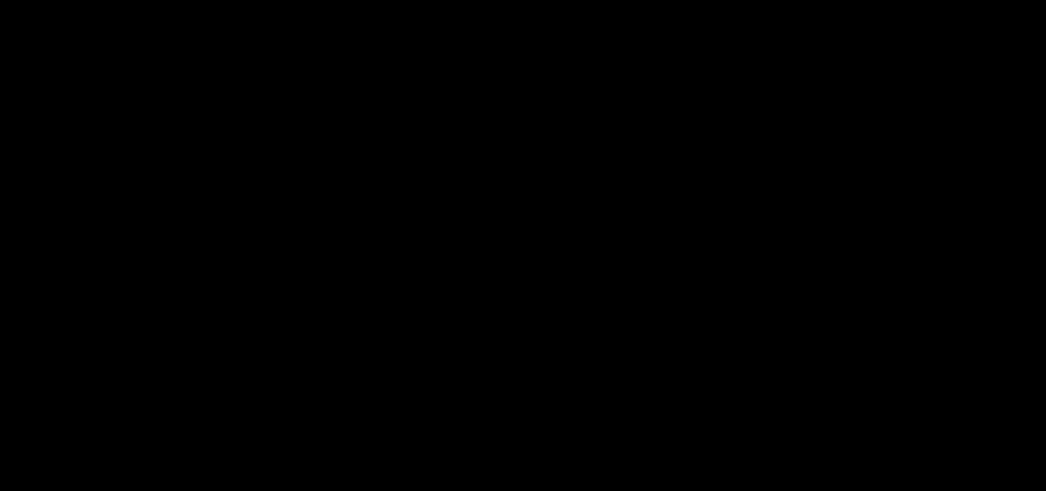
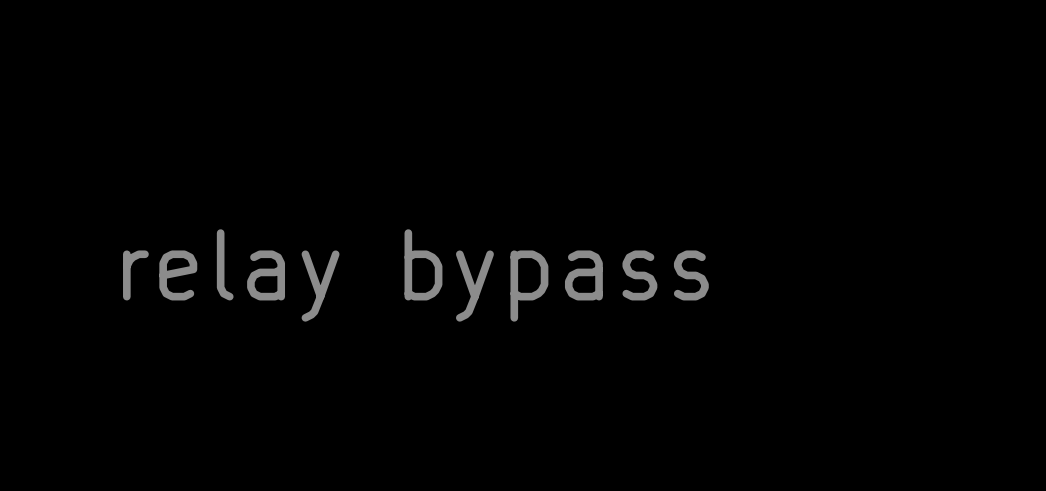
text: none -> relay bypass (415, 275)

